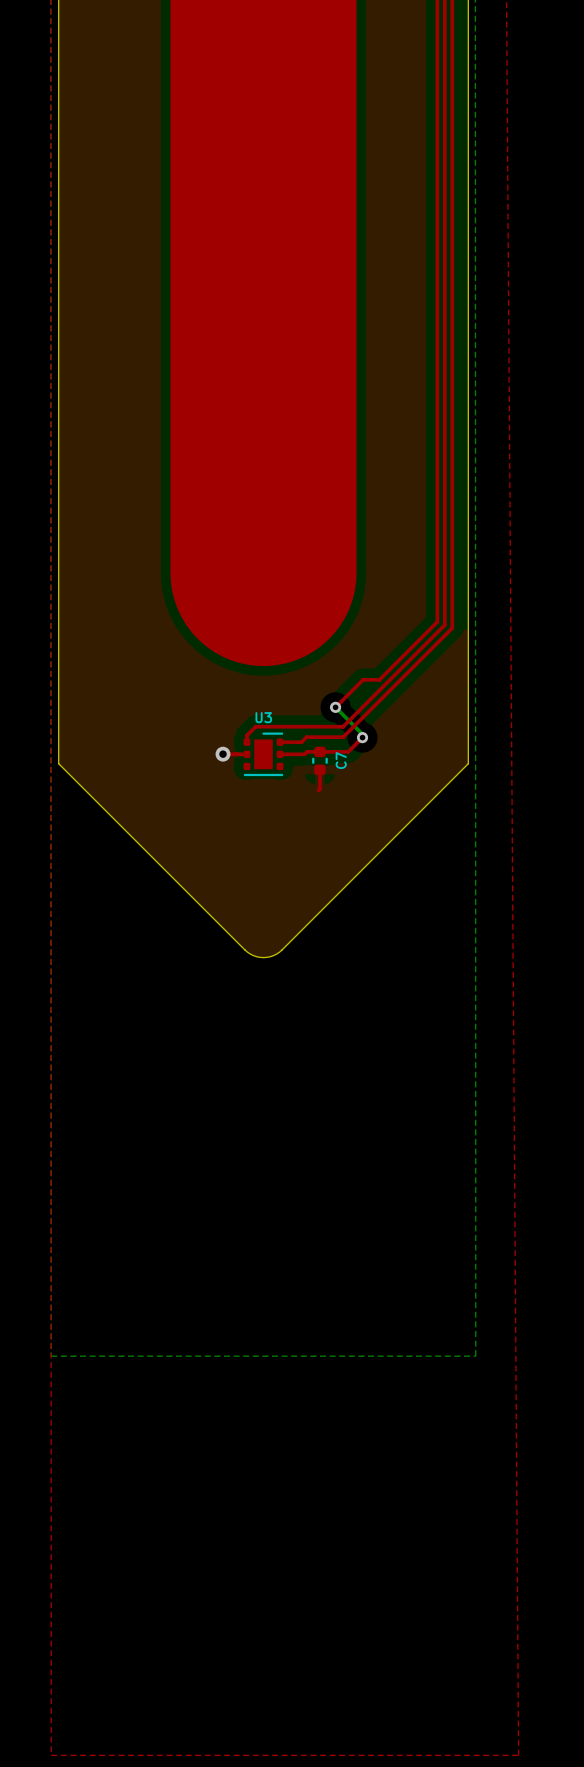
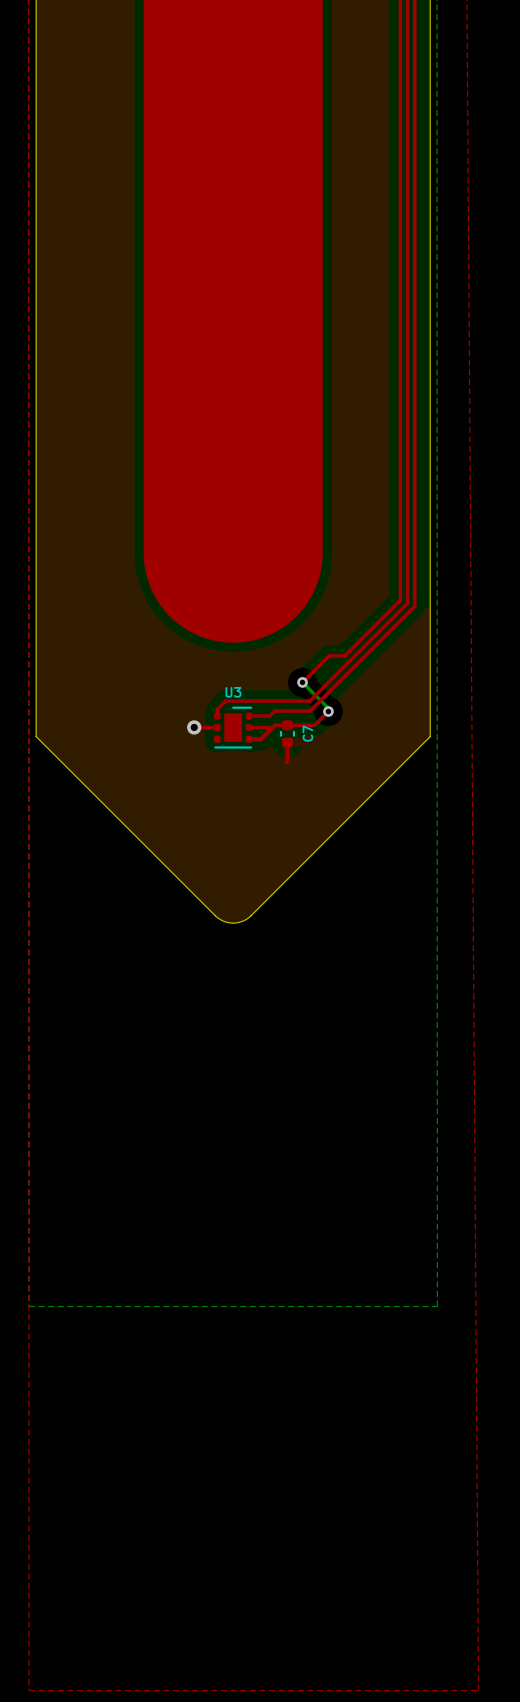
top track: none -> (272, 727) (261, 739) (249, 739)

